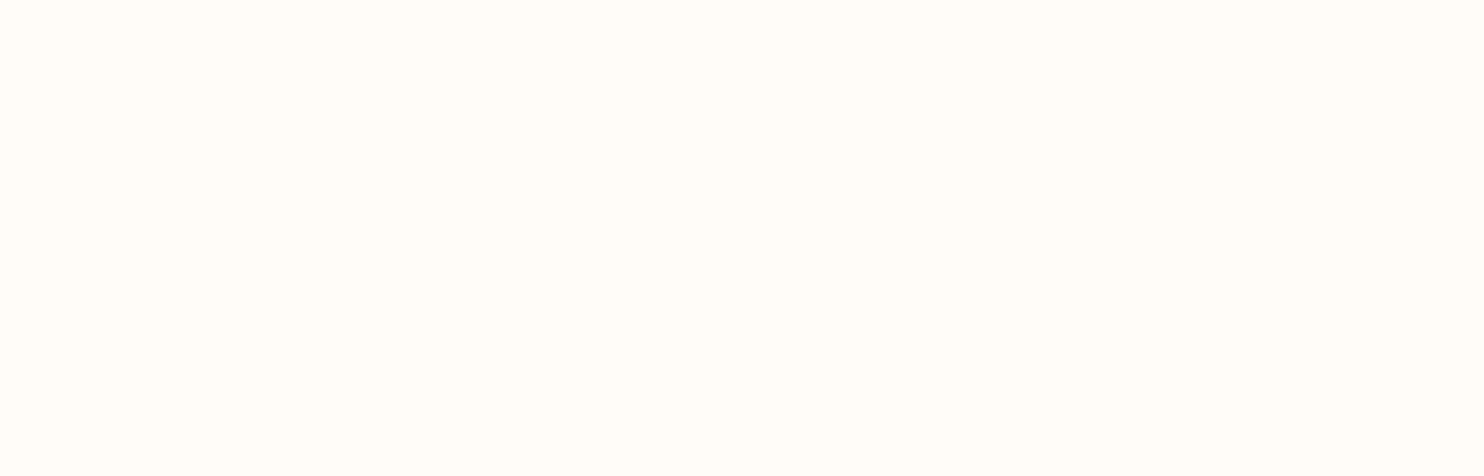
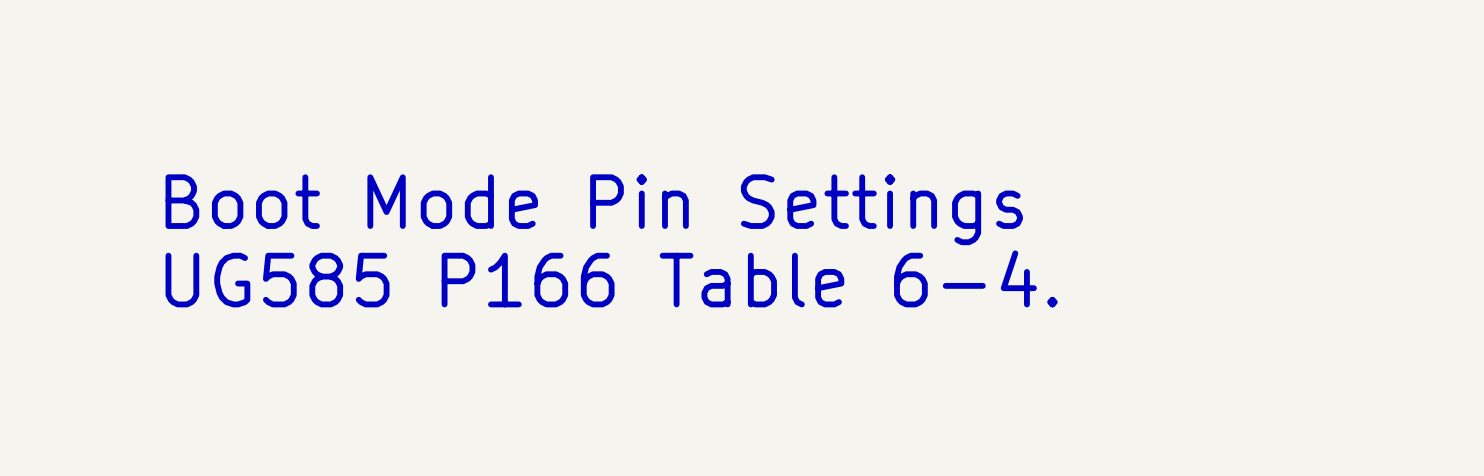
text: none -> Boot Mode Pin Settings (594, 209)
text: none -> UG585 P166 Table 6-4. (611, 278)

